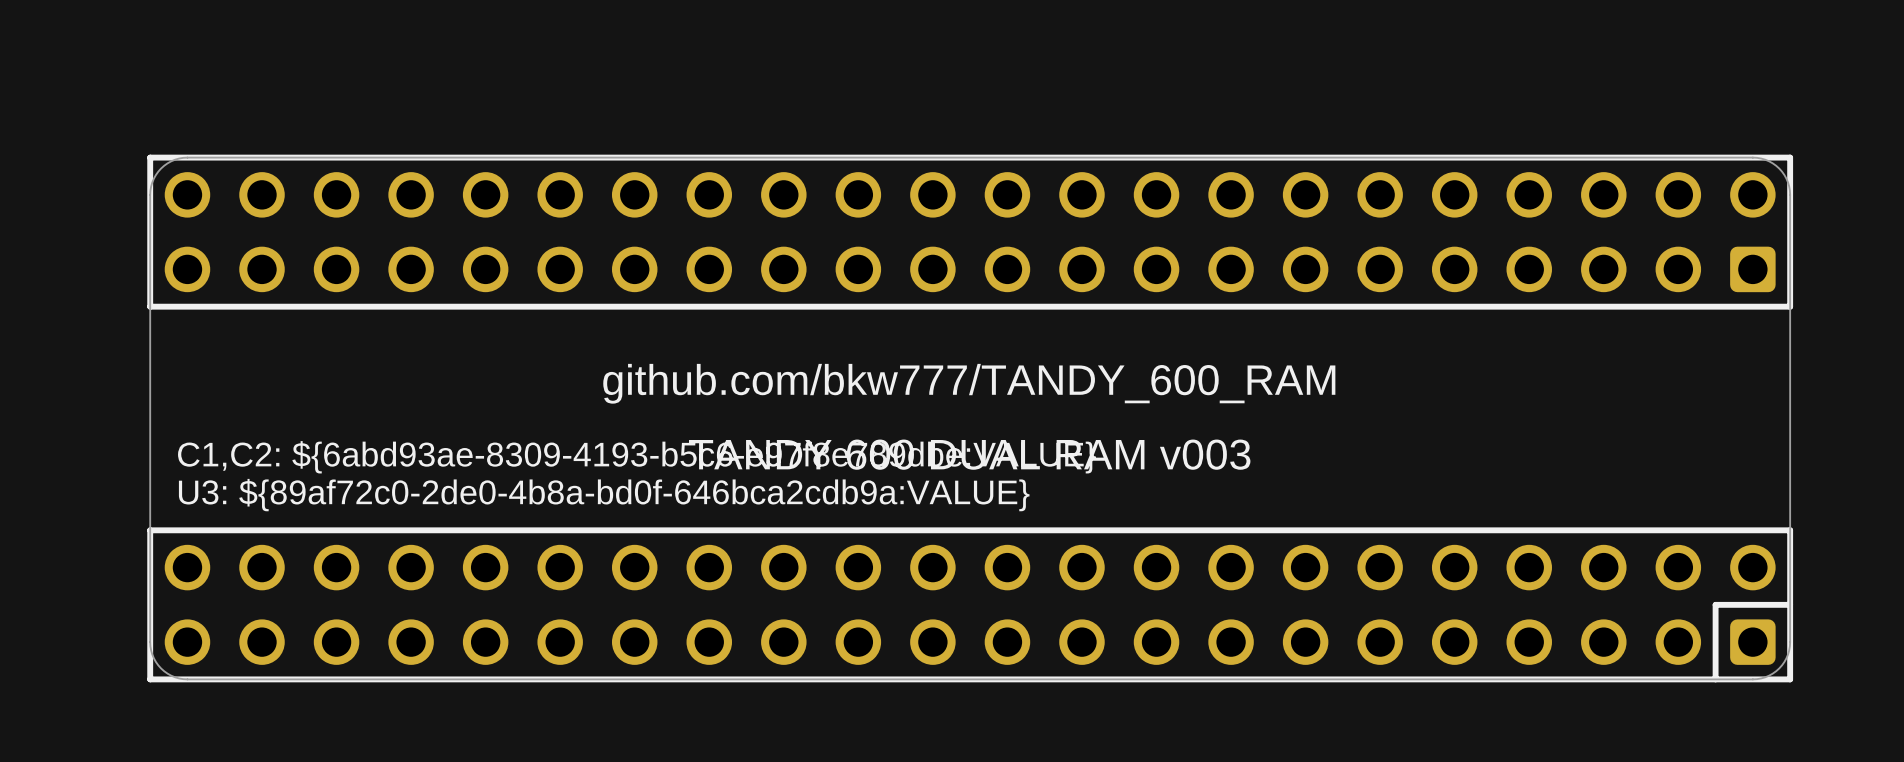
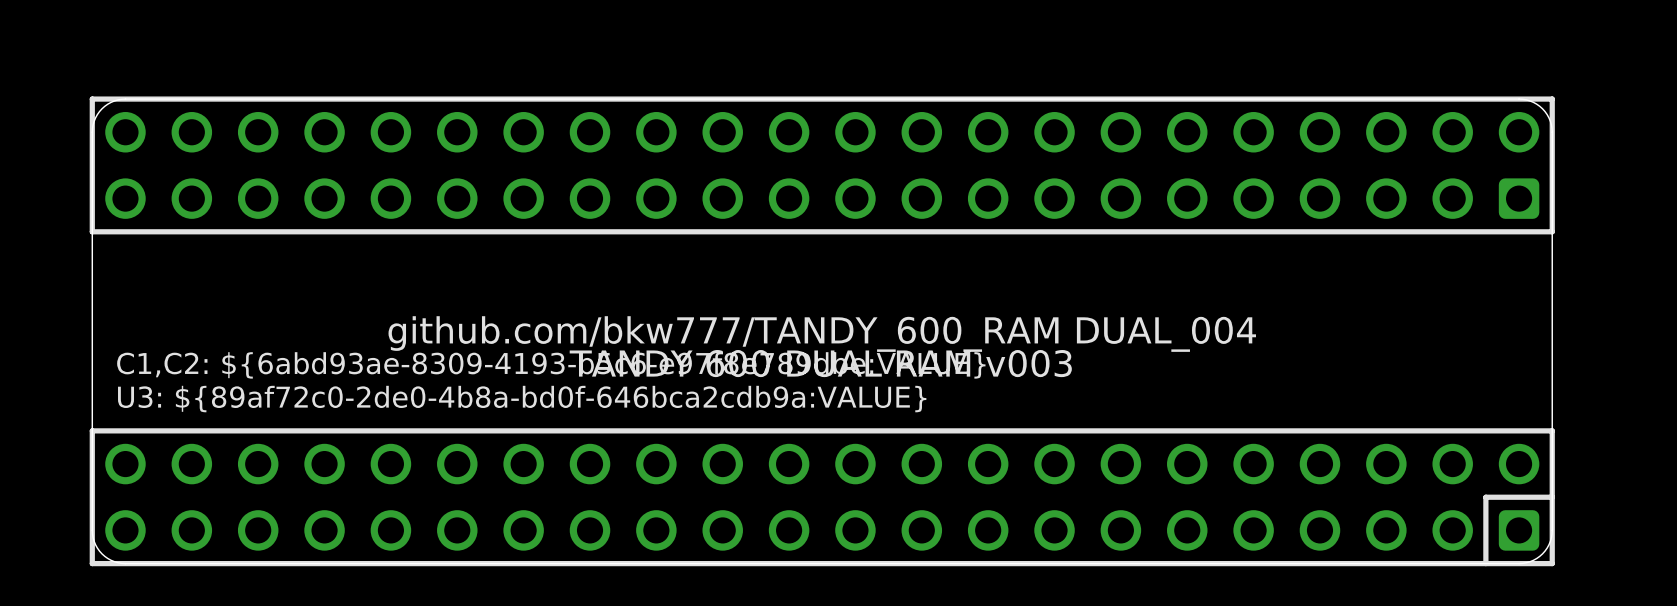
text: github.com/bkw777/TANDY_600_RAM (969, 383) -> github.com/bkw777/TANDY_600_RAM DUAL_004 (822, 334)

